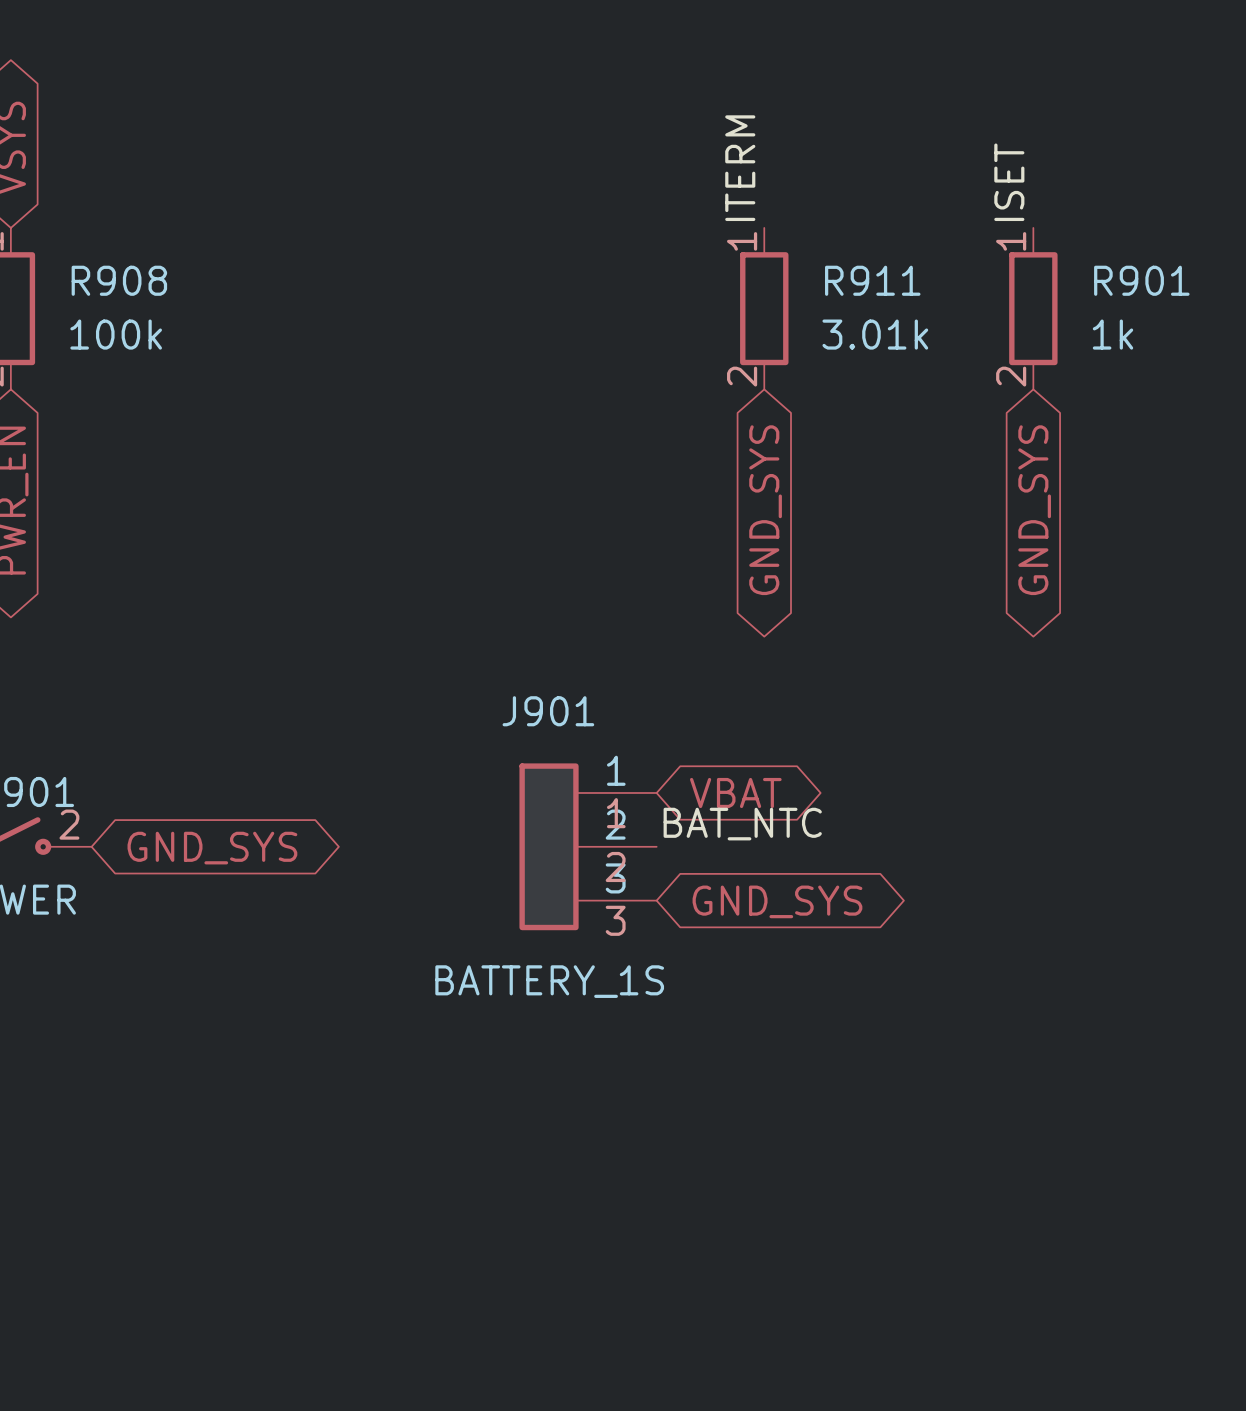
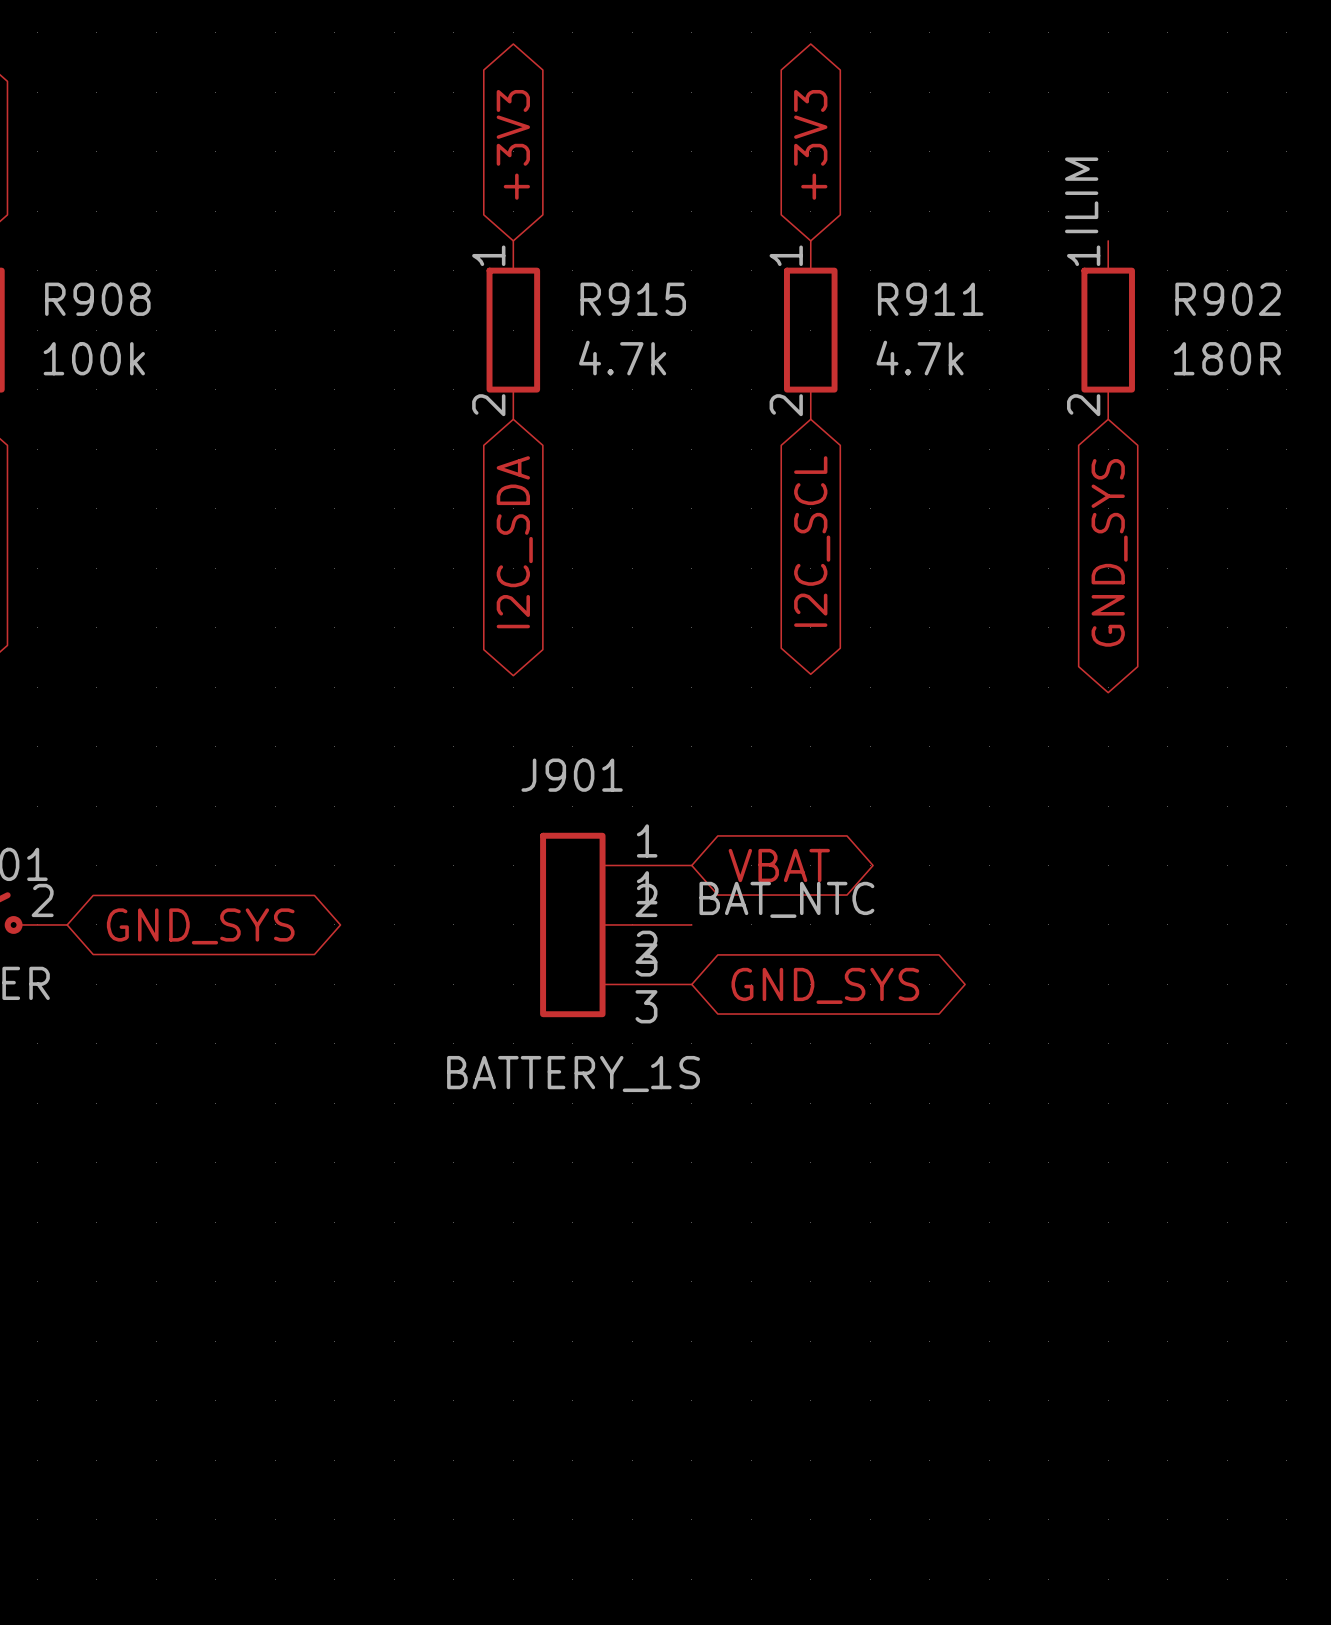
global label: none -> +3V3 (513, 144)
global label: none -> +3V3 (810, 144)
label: ITERM (740, 168) -> none
label: ISET (1009, 182) -> ILIM (1081, 195)
R901 name: R901 (1141, 280) -> R902 (1228, 299)
R915: none -> 4.7k (513, 330)
R911 value: 3.01k (875, 334) -> 4.7k (920, 358)
R901 value: 1k (1112, 334) -> 180R (1227, 358)
global label: none -> I2C_SDA (514, 542)
global label: GND_SYS (765, 510) -> I2C_SCL (812, 541)

